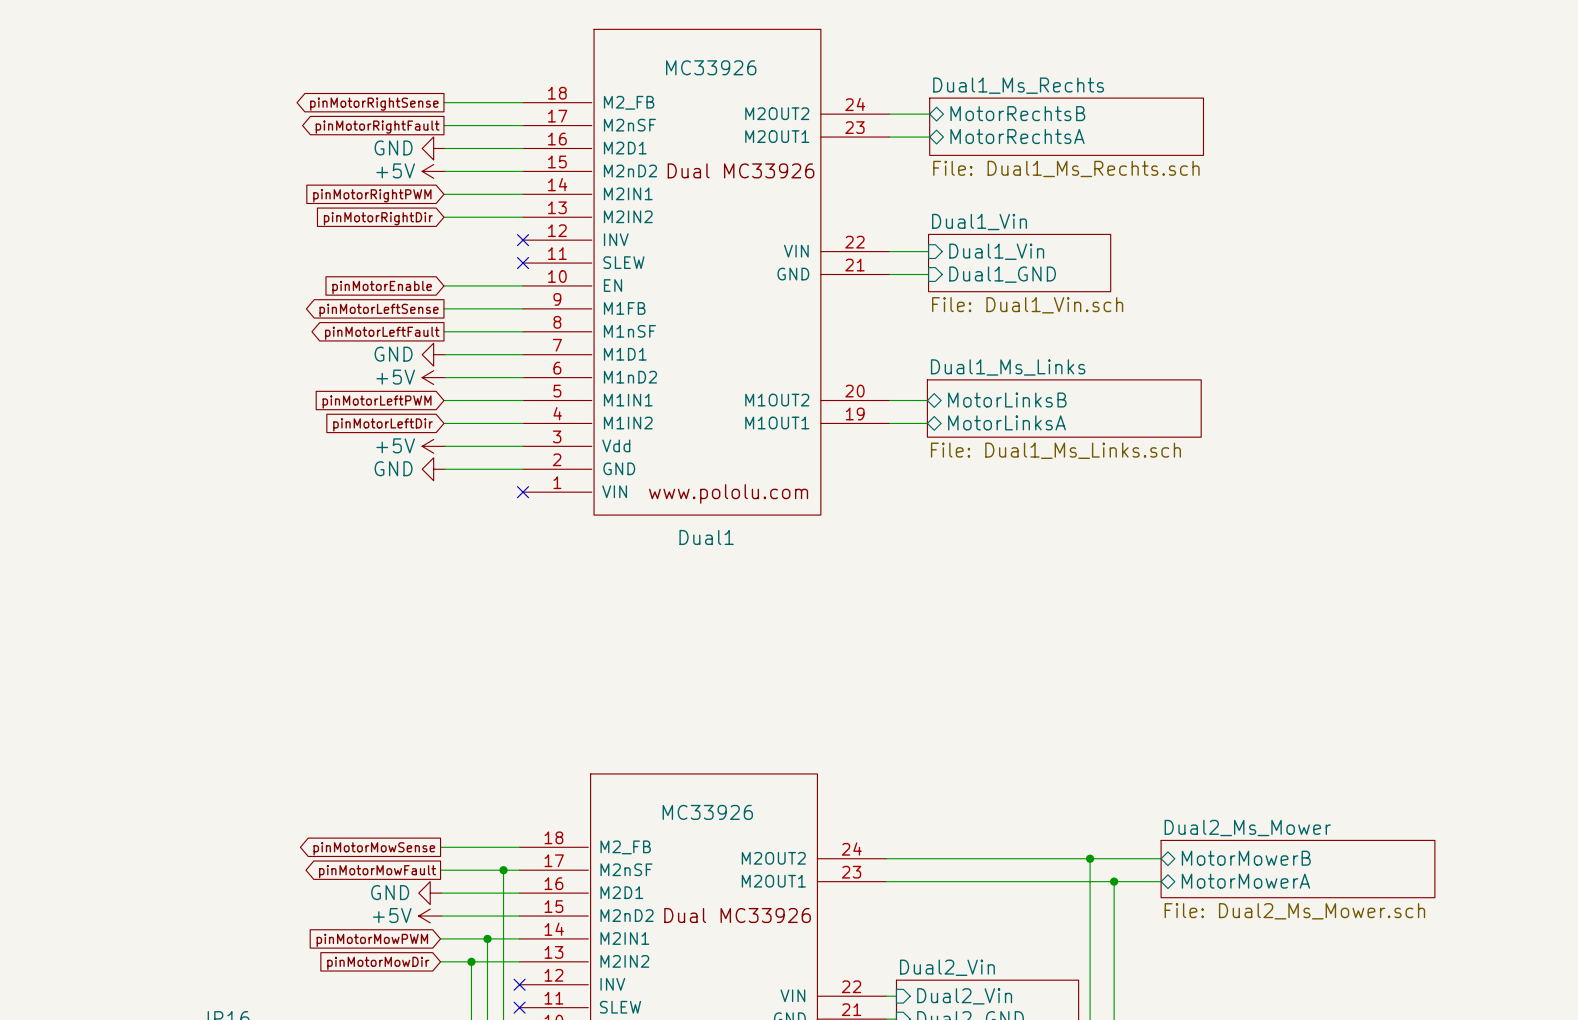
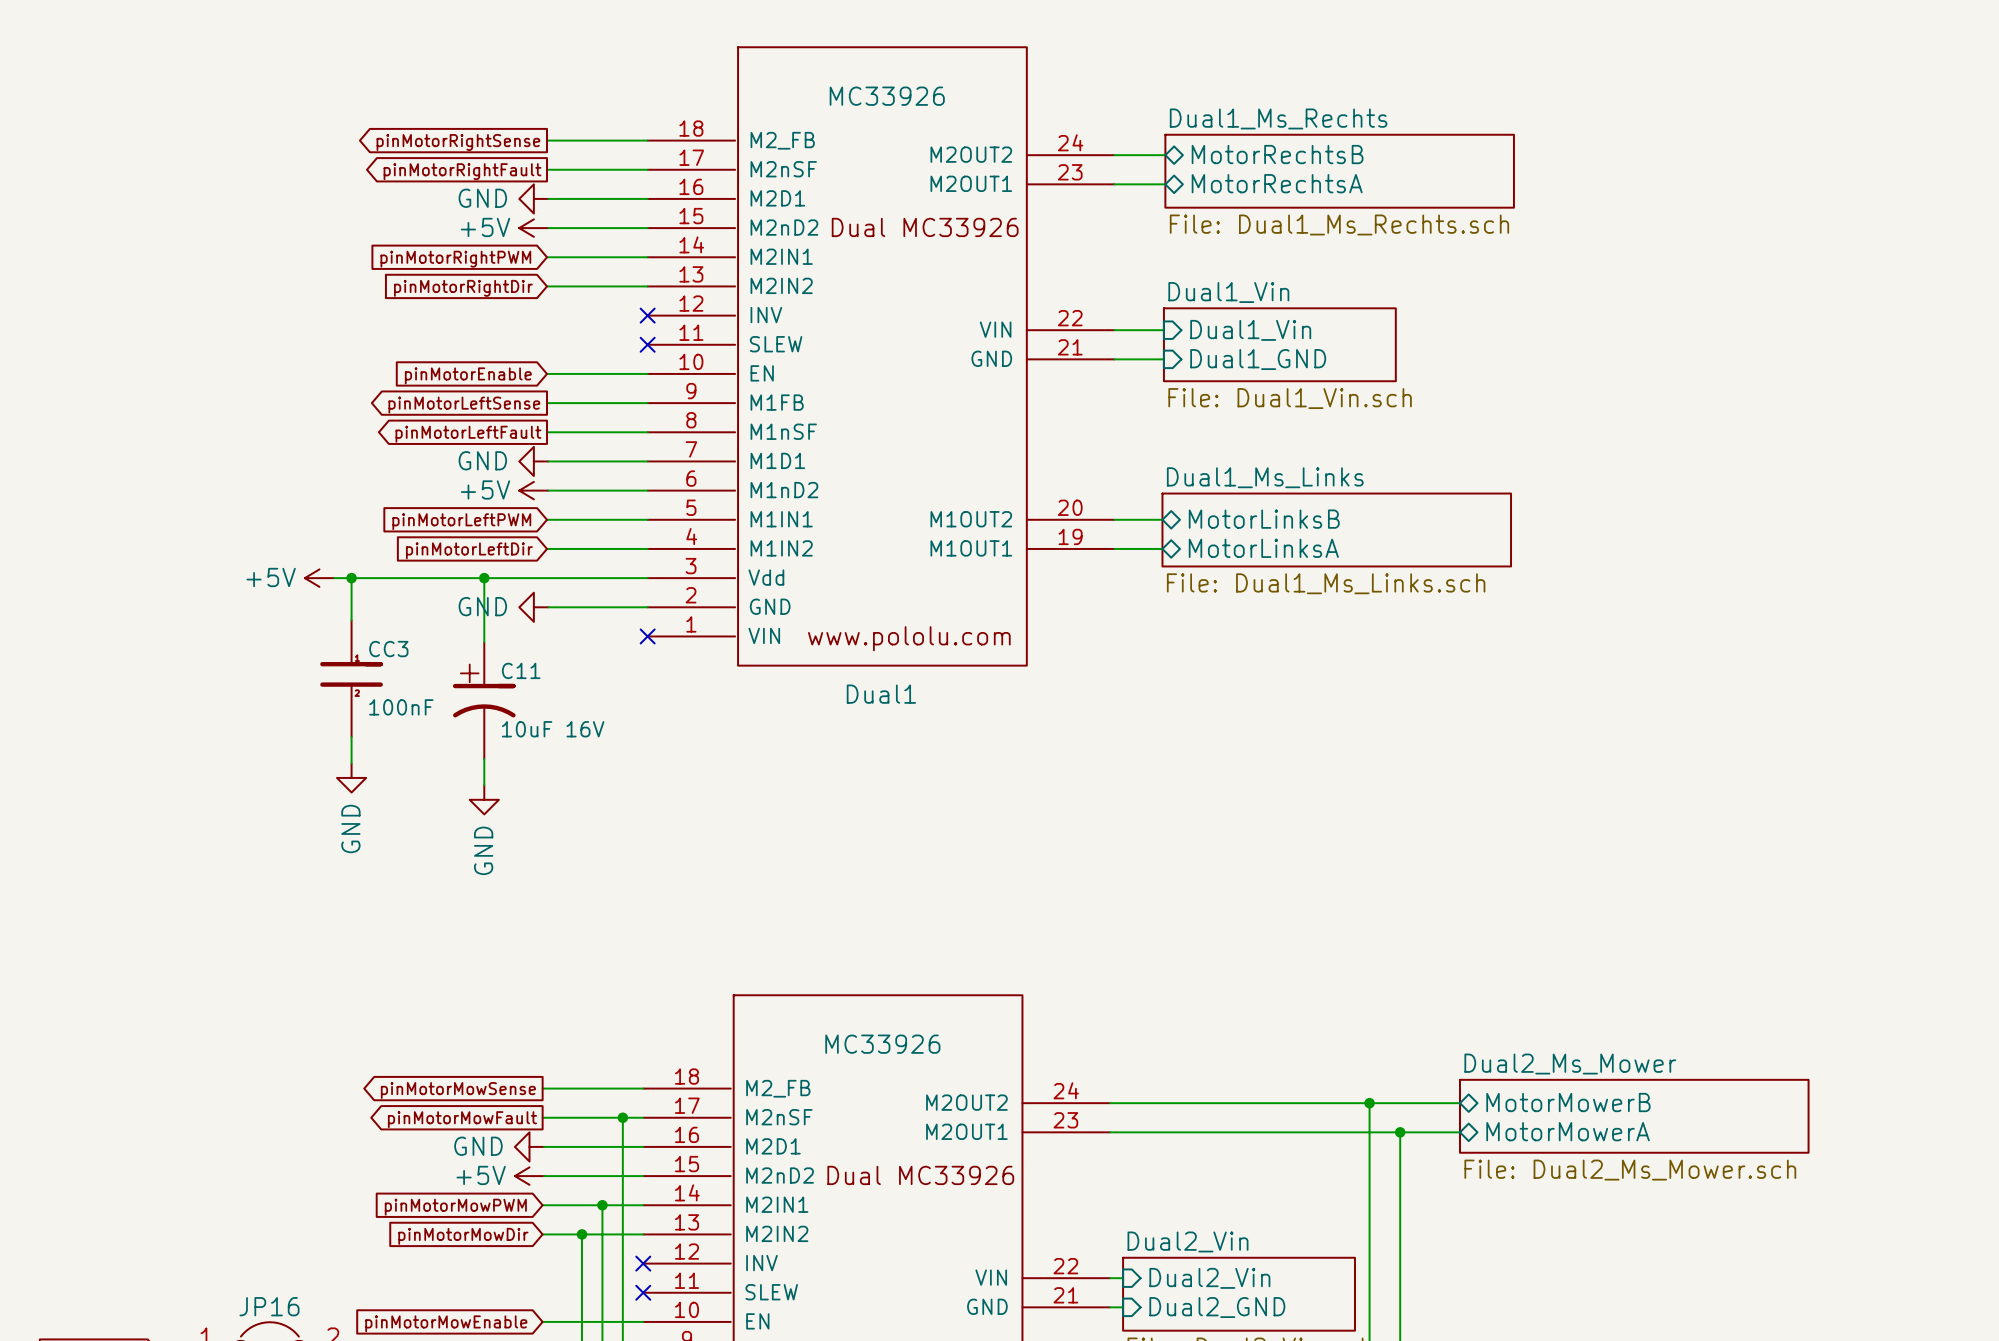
wire: none -> (334, 578) (548, 578)
wire: none -> (351, 578) (351, 620)
junction: none -> (351, 578)
wire: none -> (484, 578) (484, 642)
junction: none -> (484, 578)
power symbol position: +5V (433, 446) -> +5V (319, 578)
CC3: none -> 100nF (351, 678)
C11: none -> 10uF 16V (484, 700)
wire: none -> (351, 737) (351, 763)
wire: none -> (484, 758) (484, 785)
power symbol: none -> GND (351, 777)
power symbol: none -> GND (484, 799)

